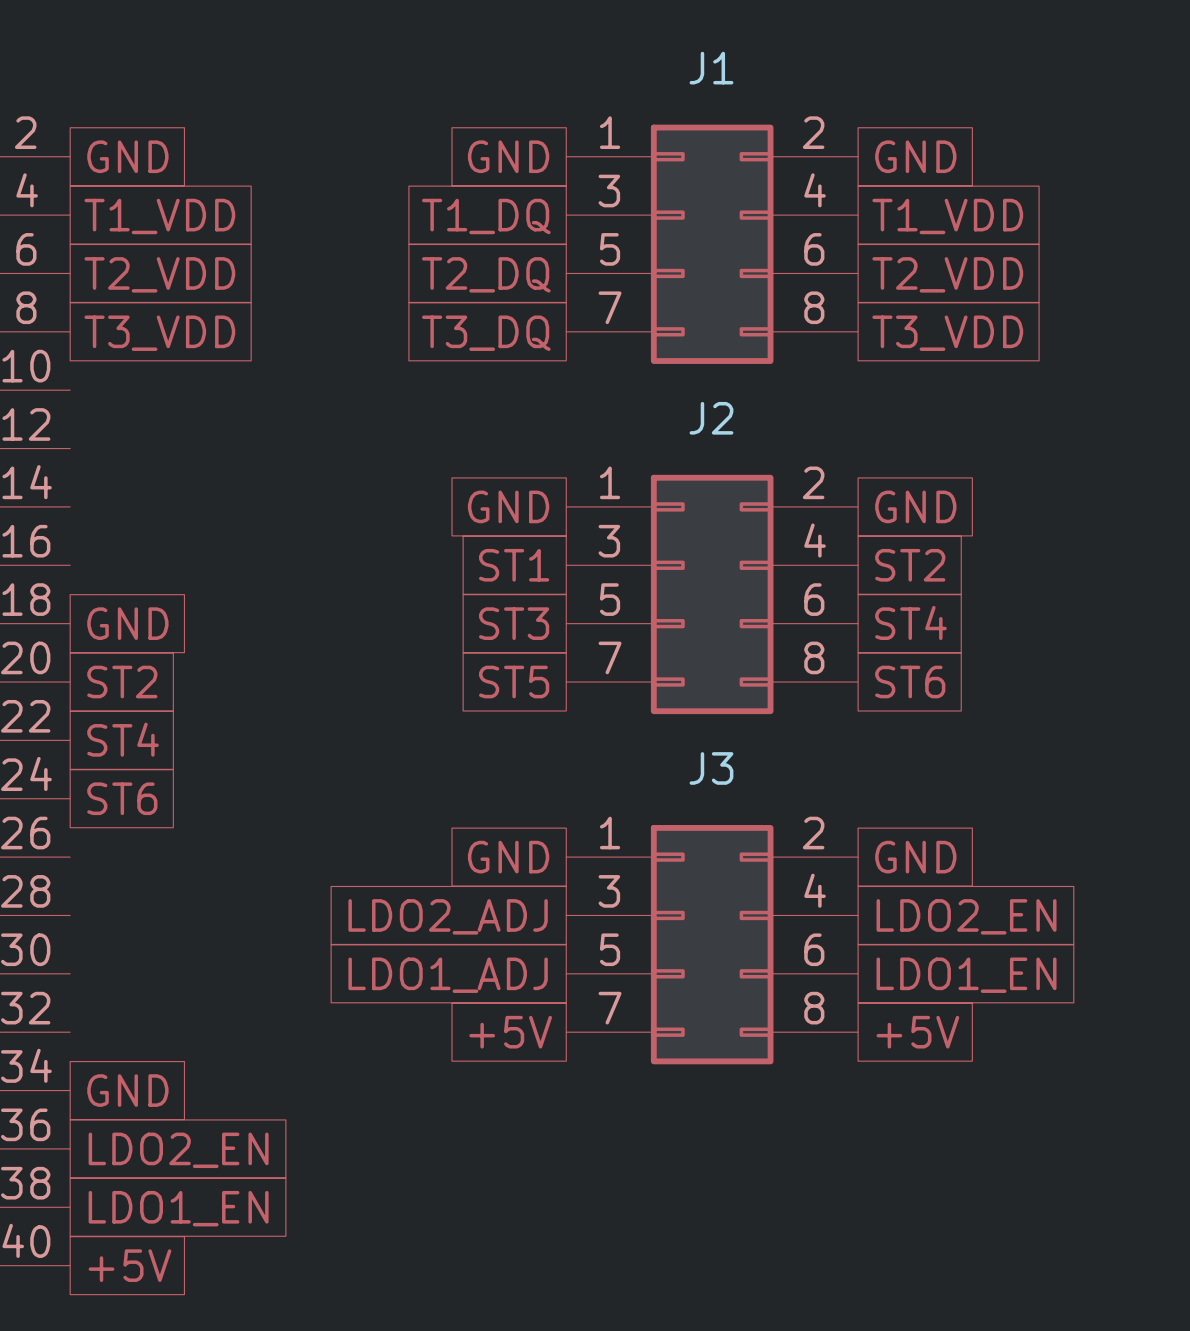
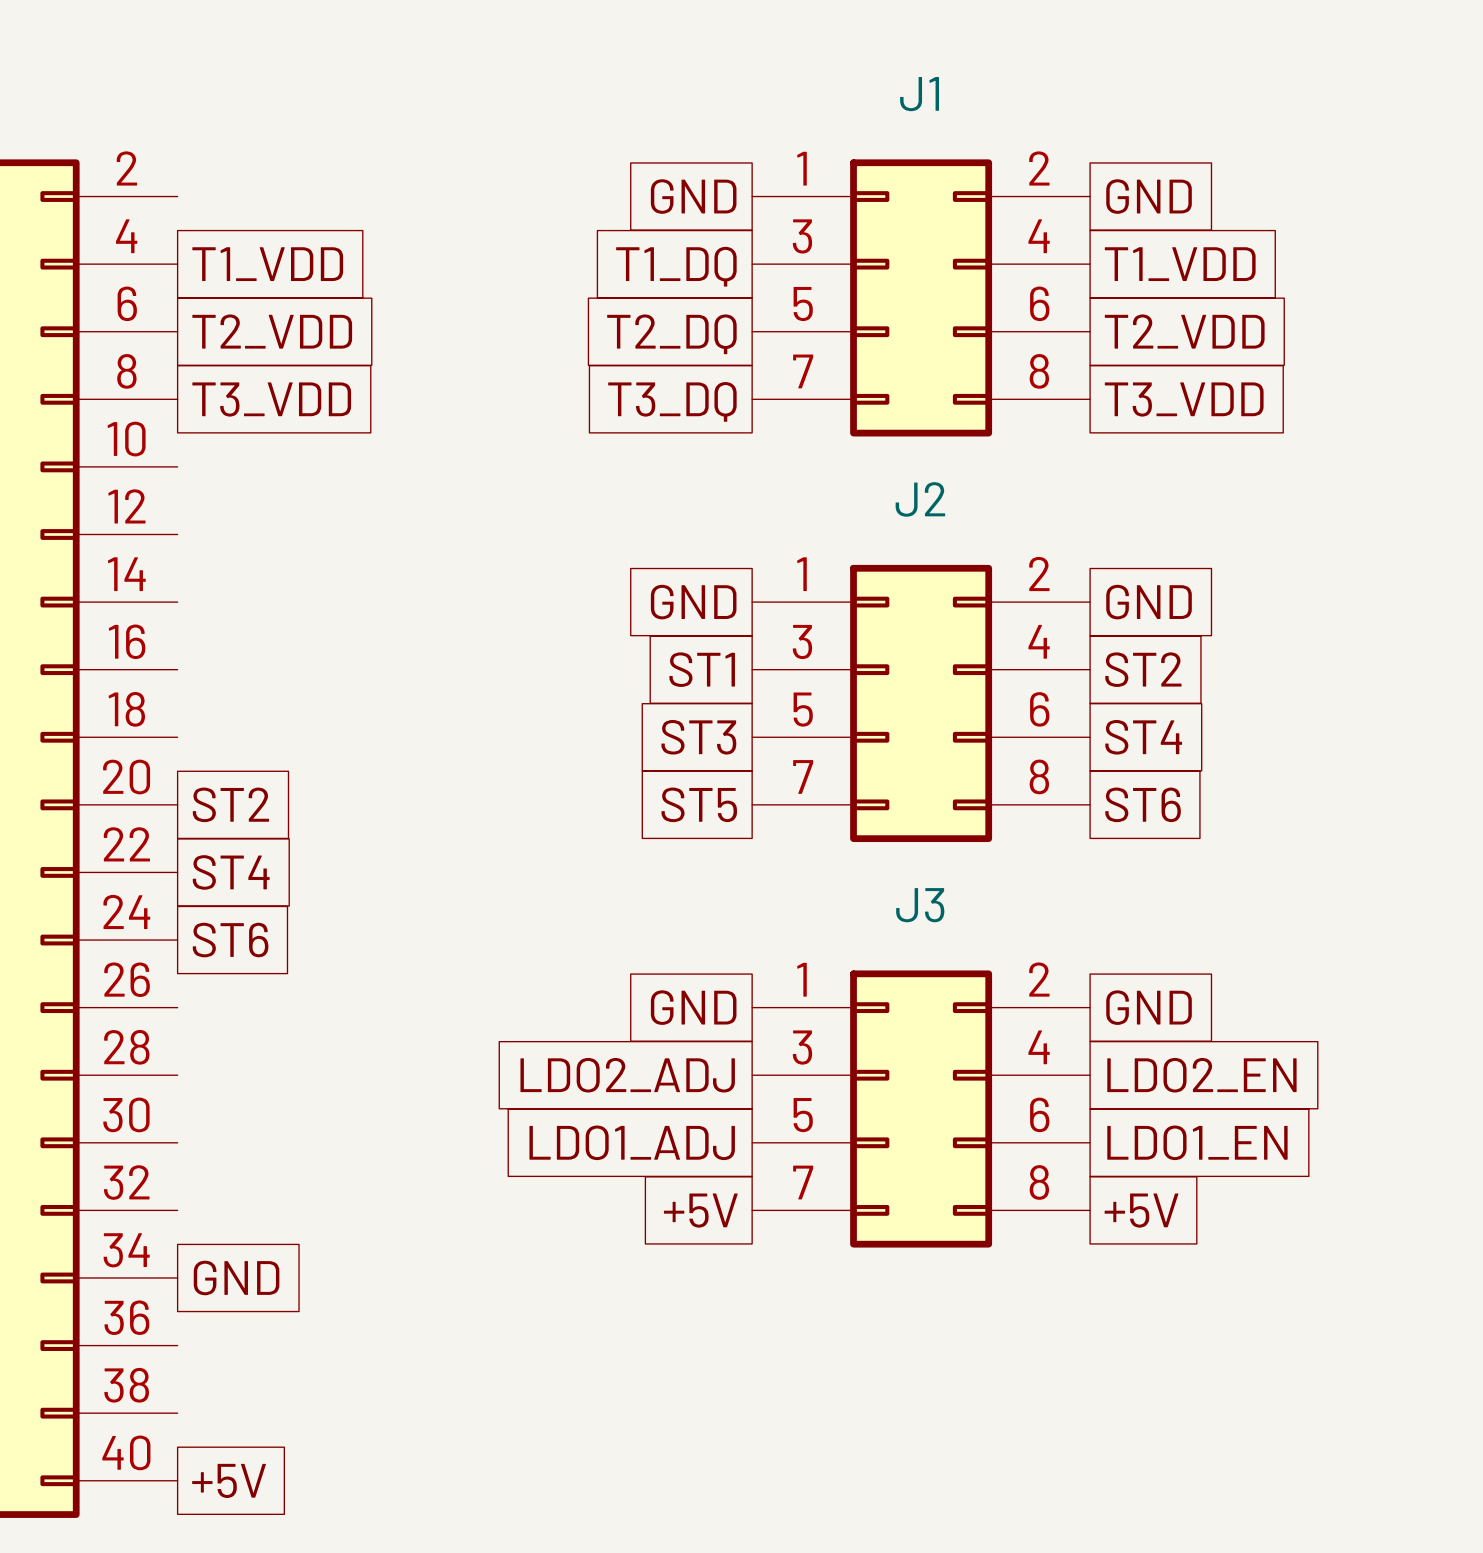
global label: GND (127, 156) -> none
global label: GND (127, 623) -> none
global label: LDO2_EN (178, 1150) -> none
global label: LDO1_EN (178, 1208) -> none

